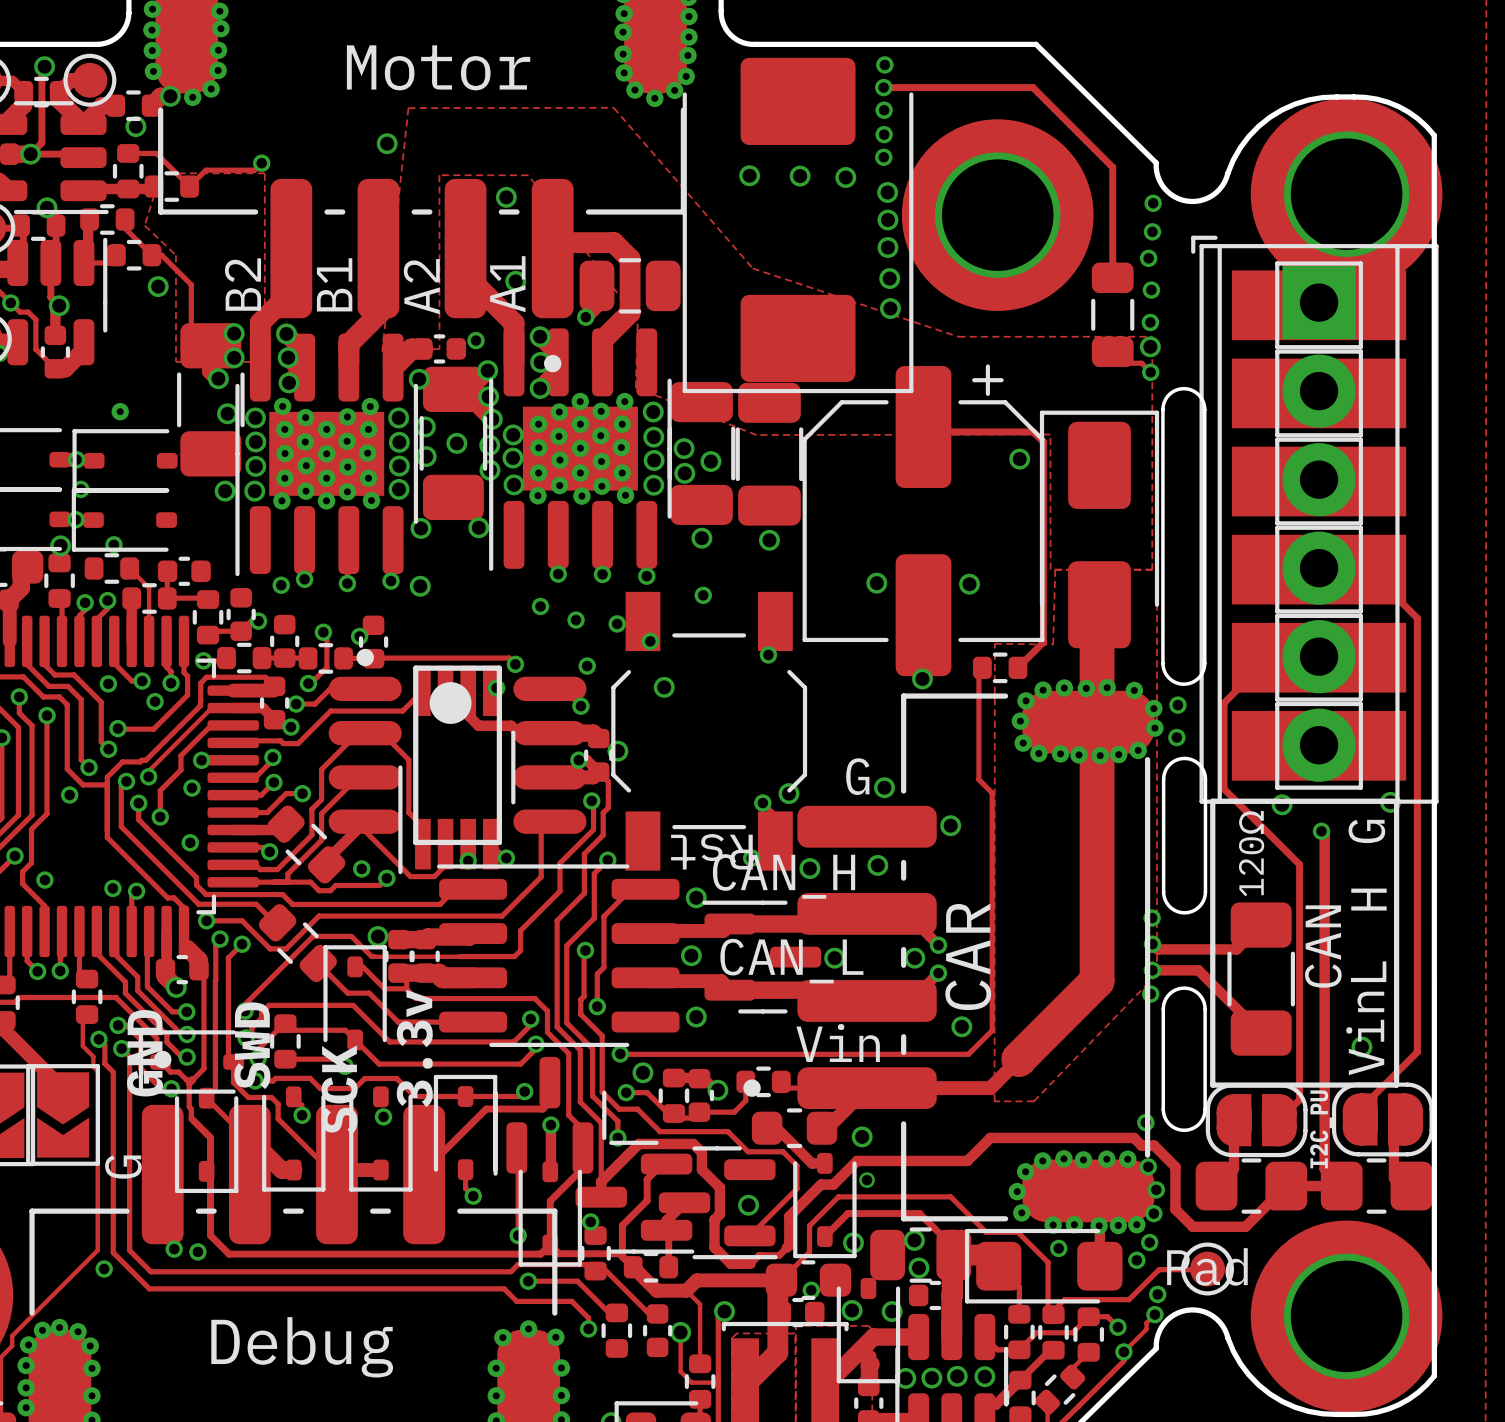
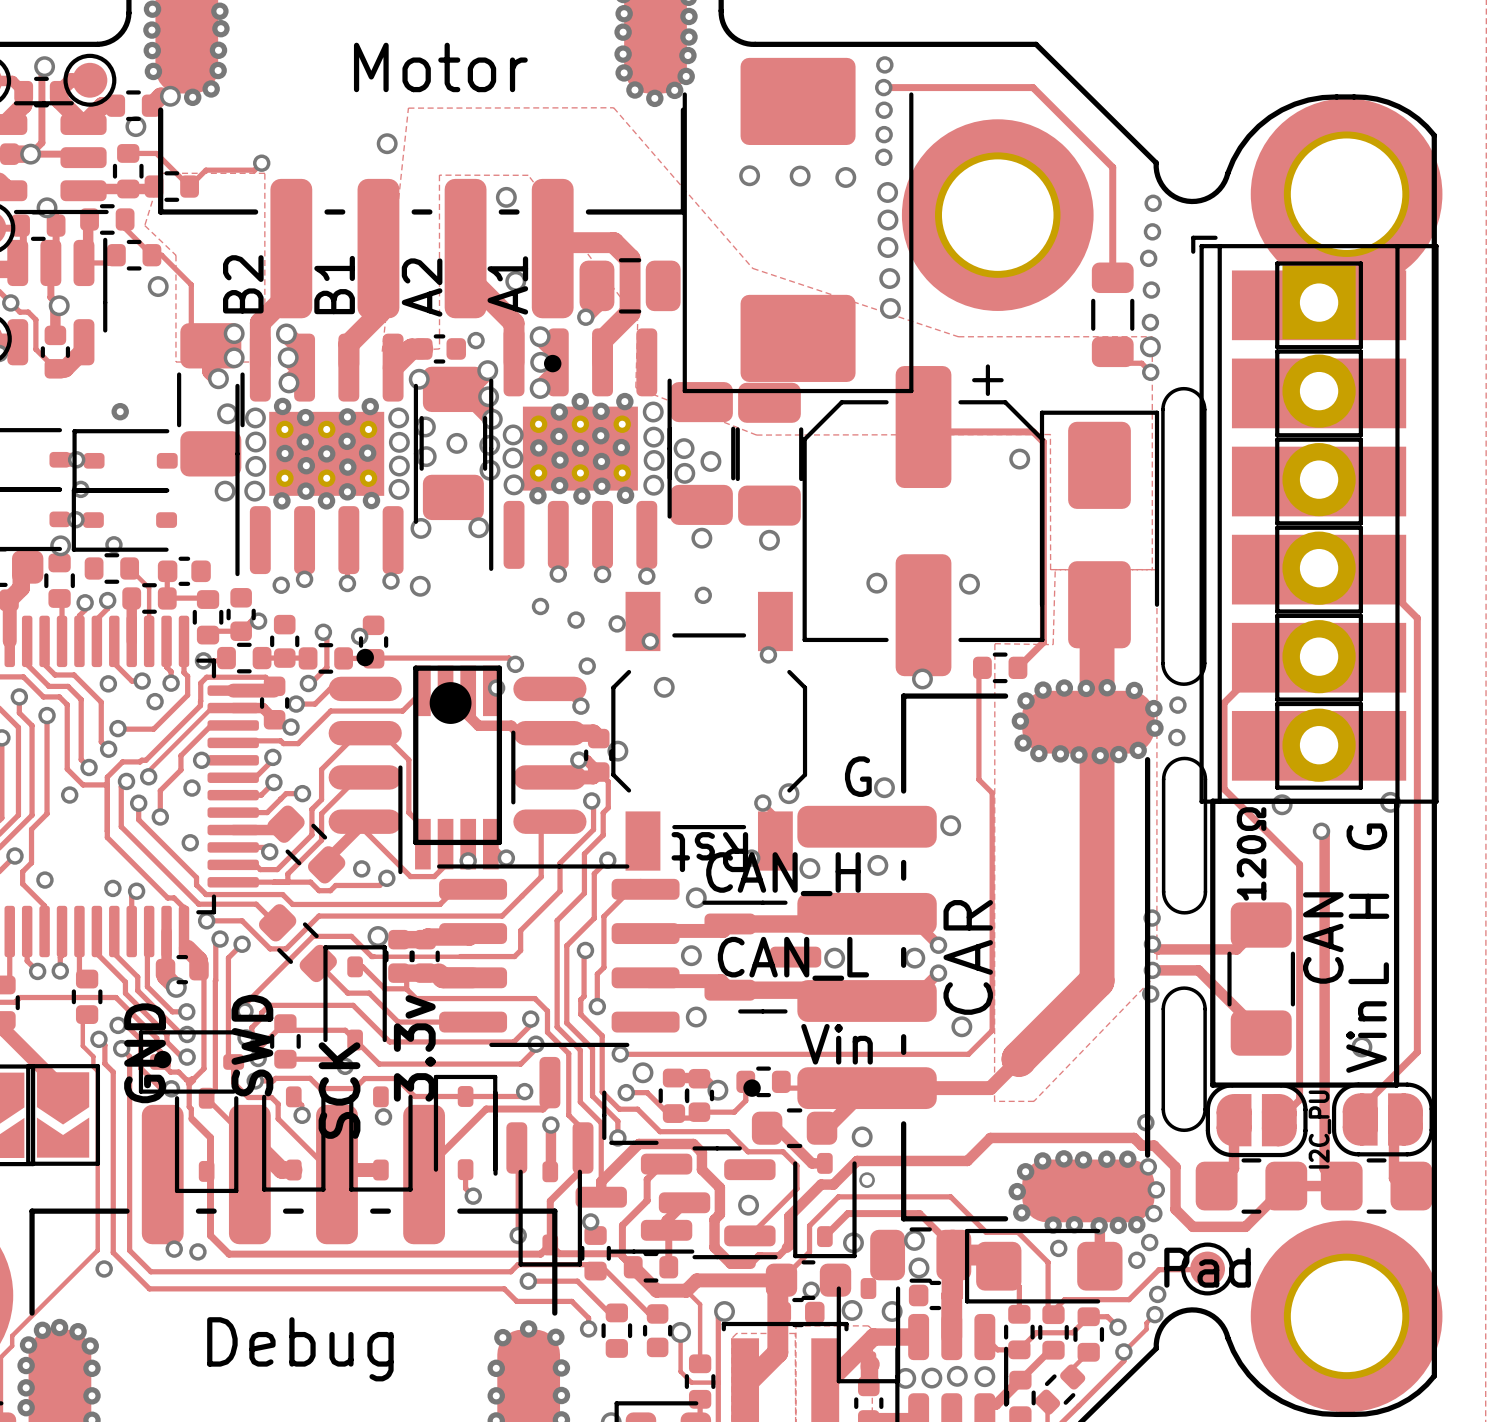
text: G (123, 1167) -> none

